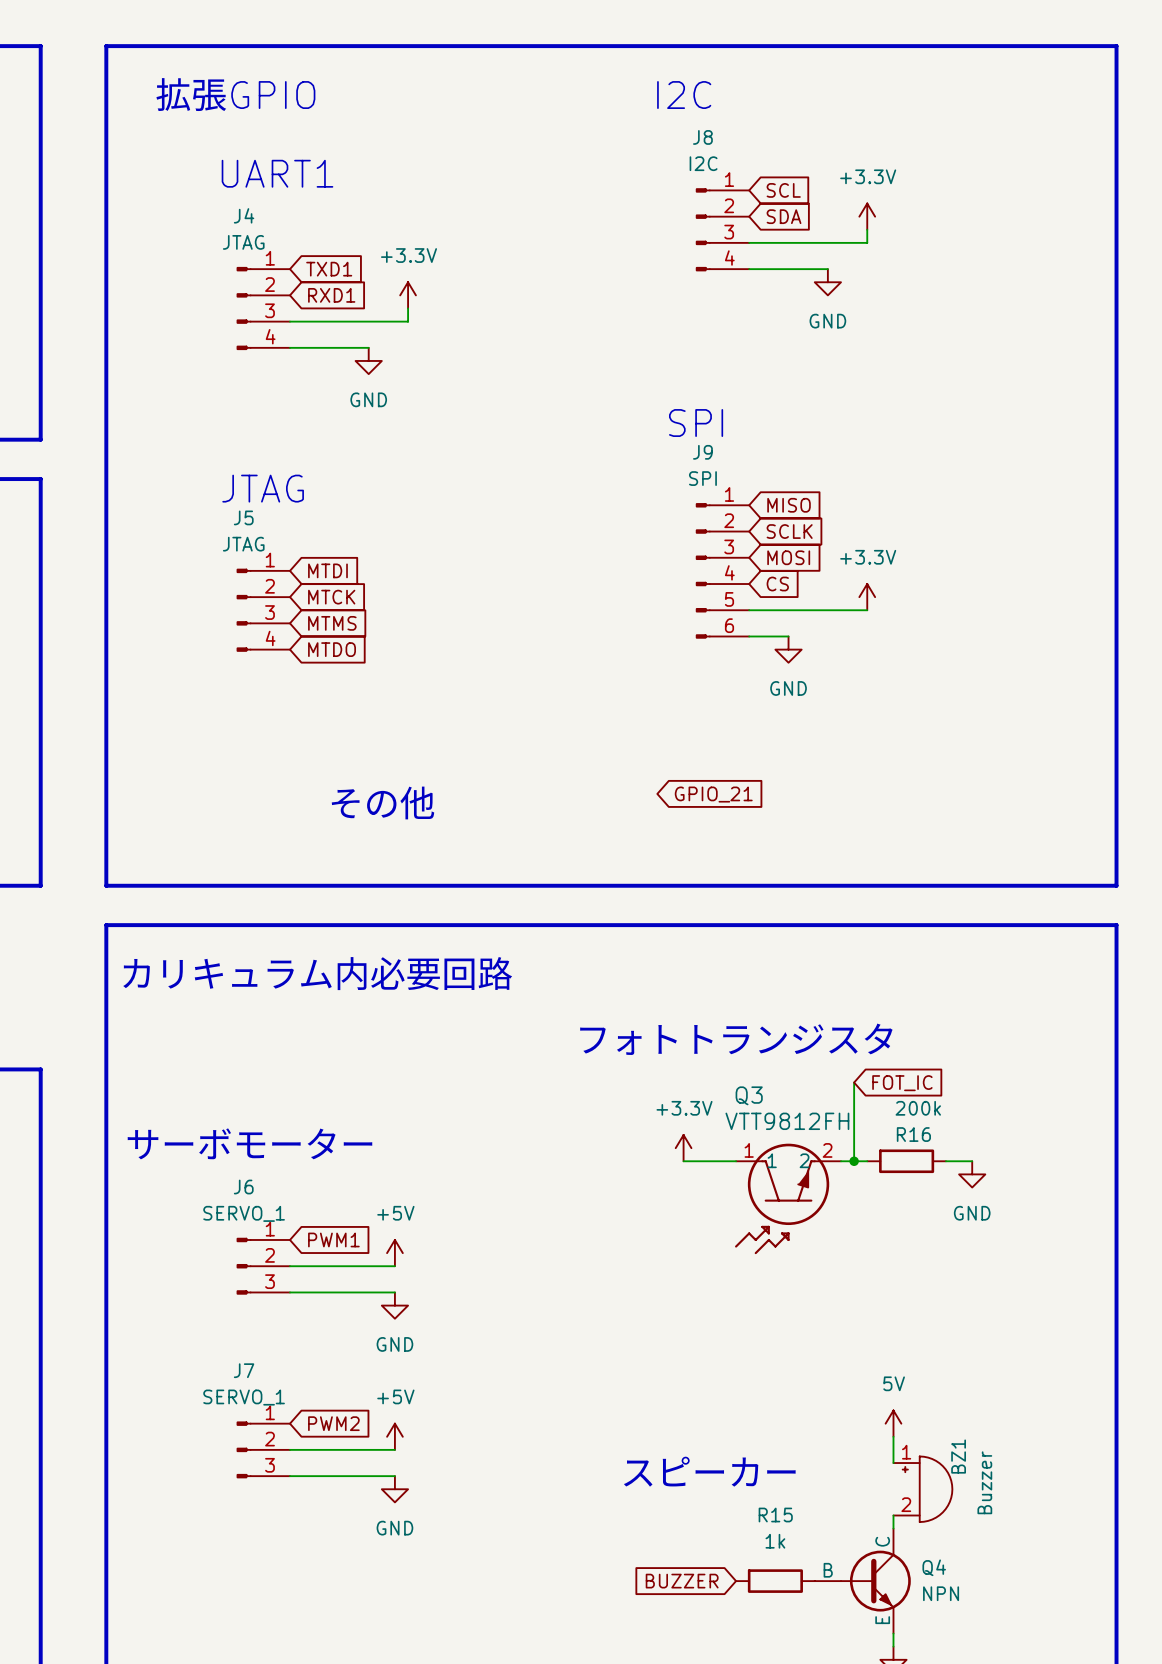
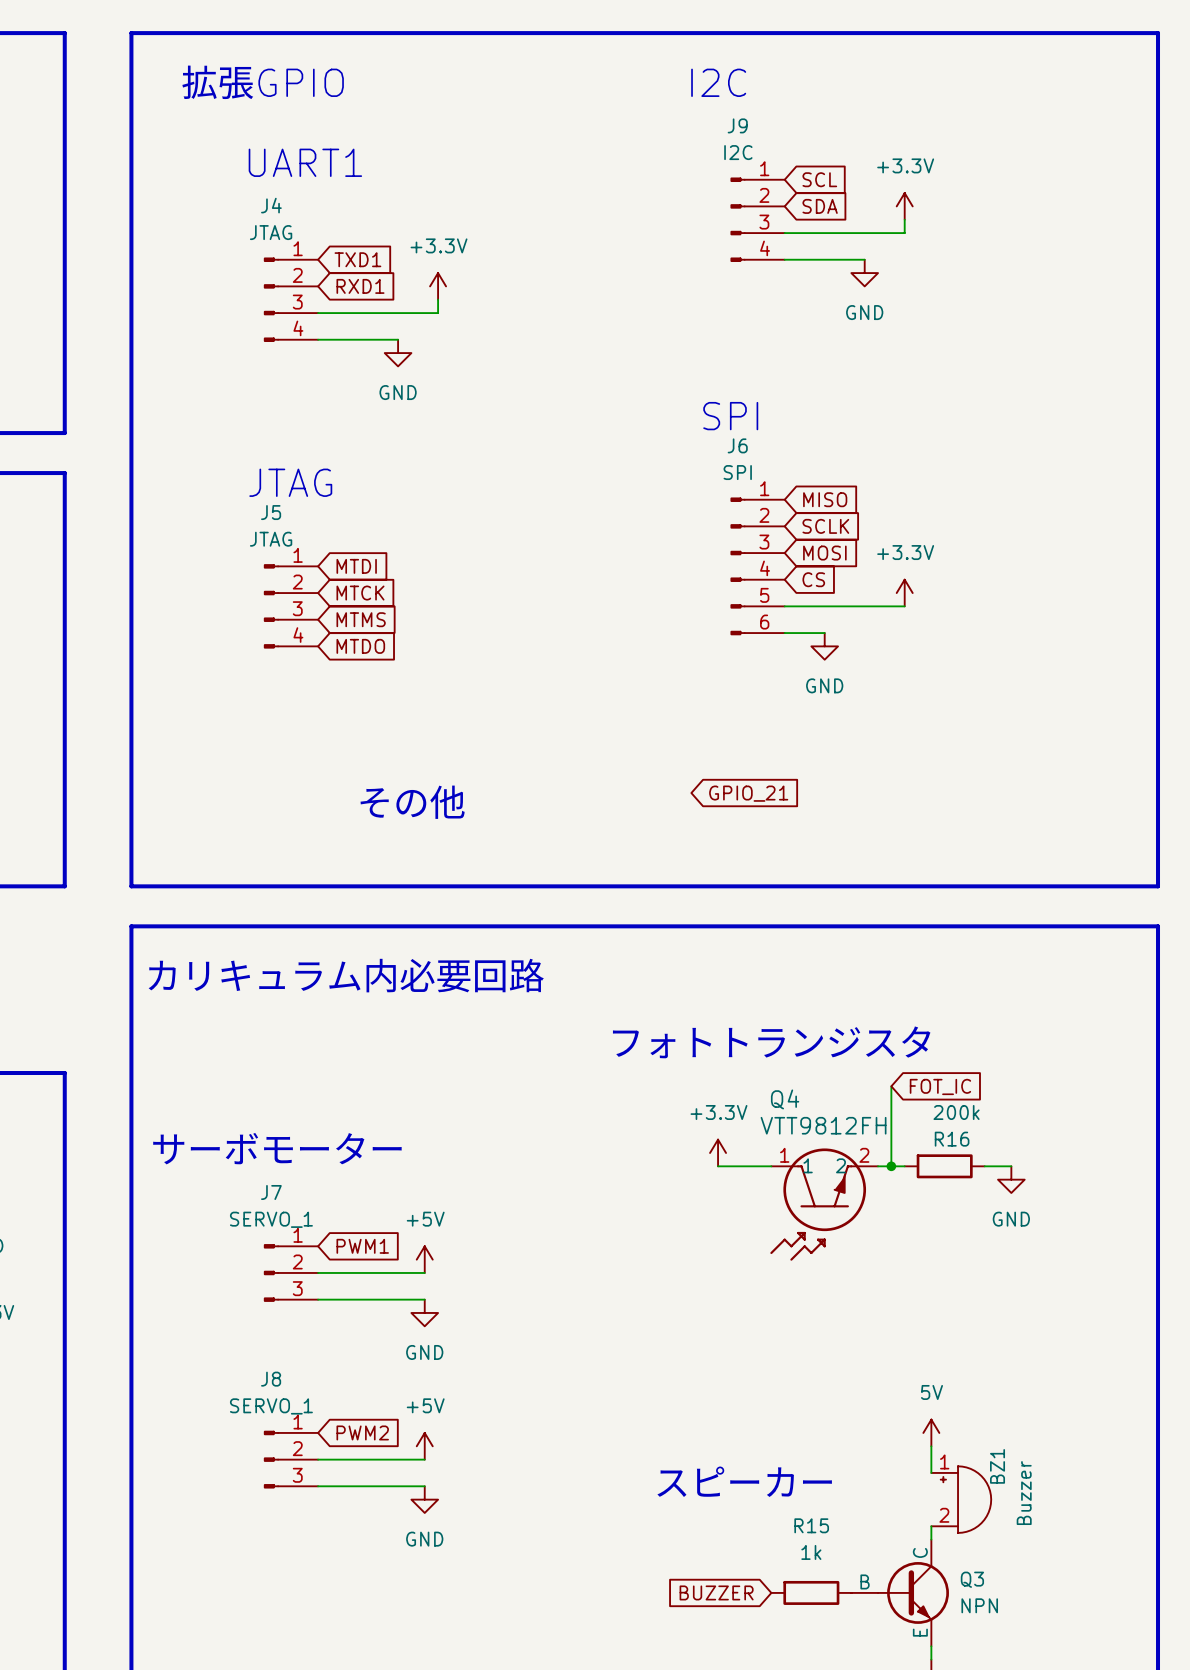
J8 name: J8 (702, 137) -> J9 (737, 125)
J9 name: J9 (702, 452) -> J6 (737, 445)
Q3 name: Q3 (749, 1095) -> Q4 (785, 1099)
J6 name: J6 (243, 1187) -> J7 (271, 1192)
J7 name: J7 (244, 1370) -> J8 (271, 1379)
Q4 name: Q4 (934, 1567) -> Q3 (972, 1579)

